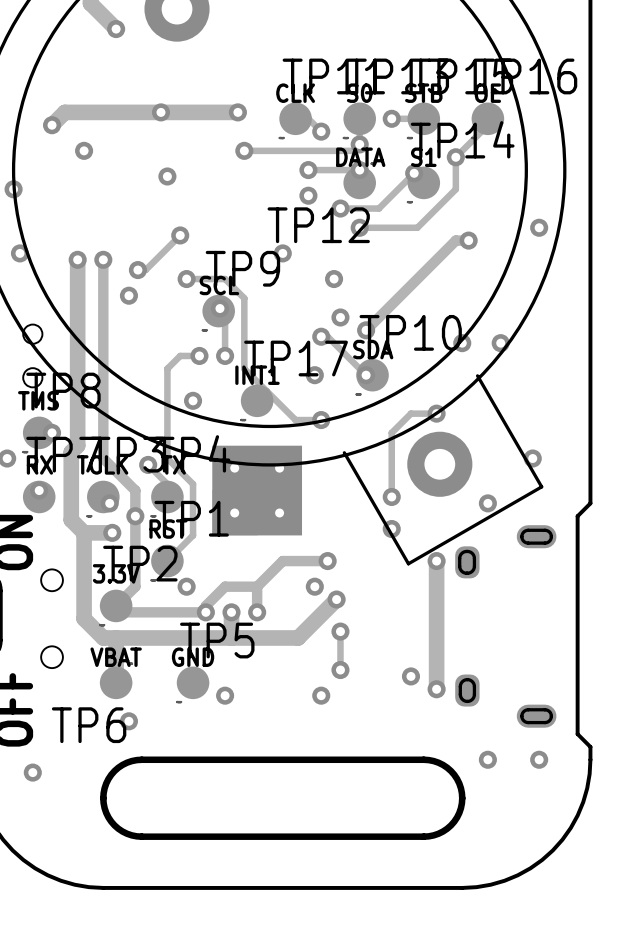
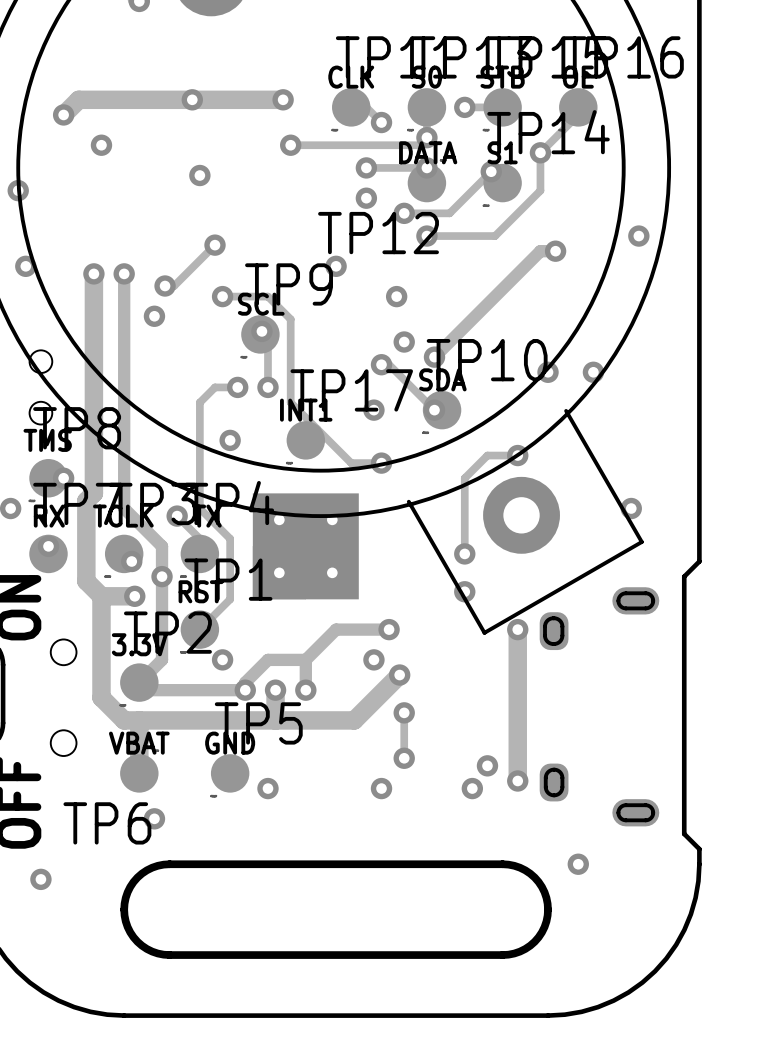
via: (487, 503) -> none
via: none -> (472, 788)
via: (539, 759) -> none

